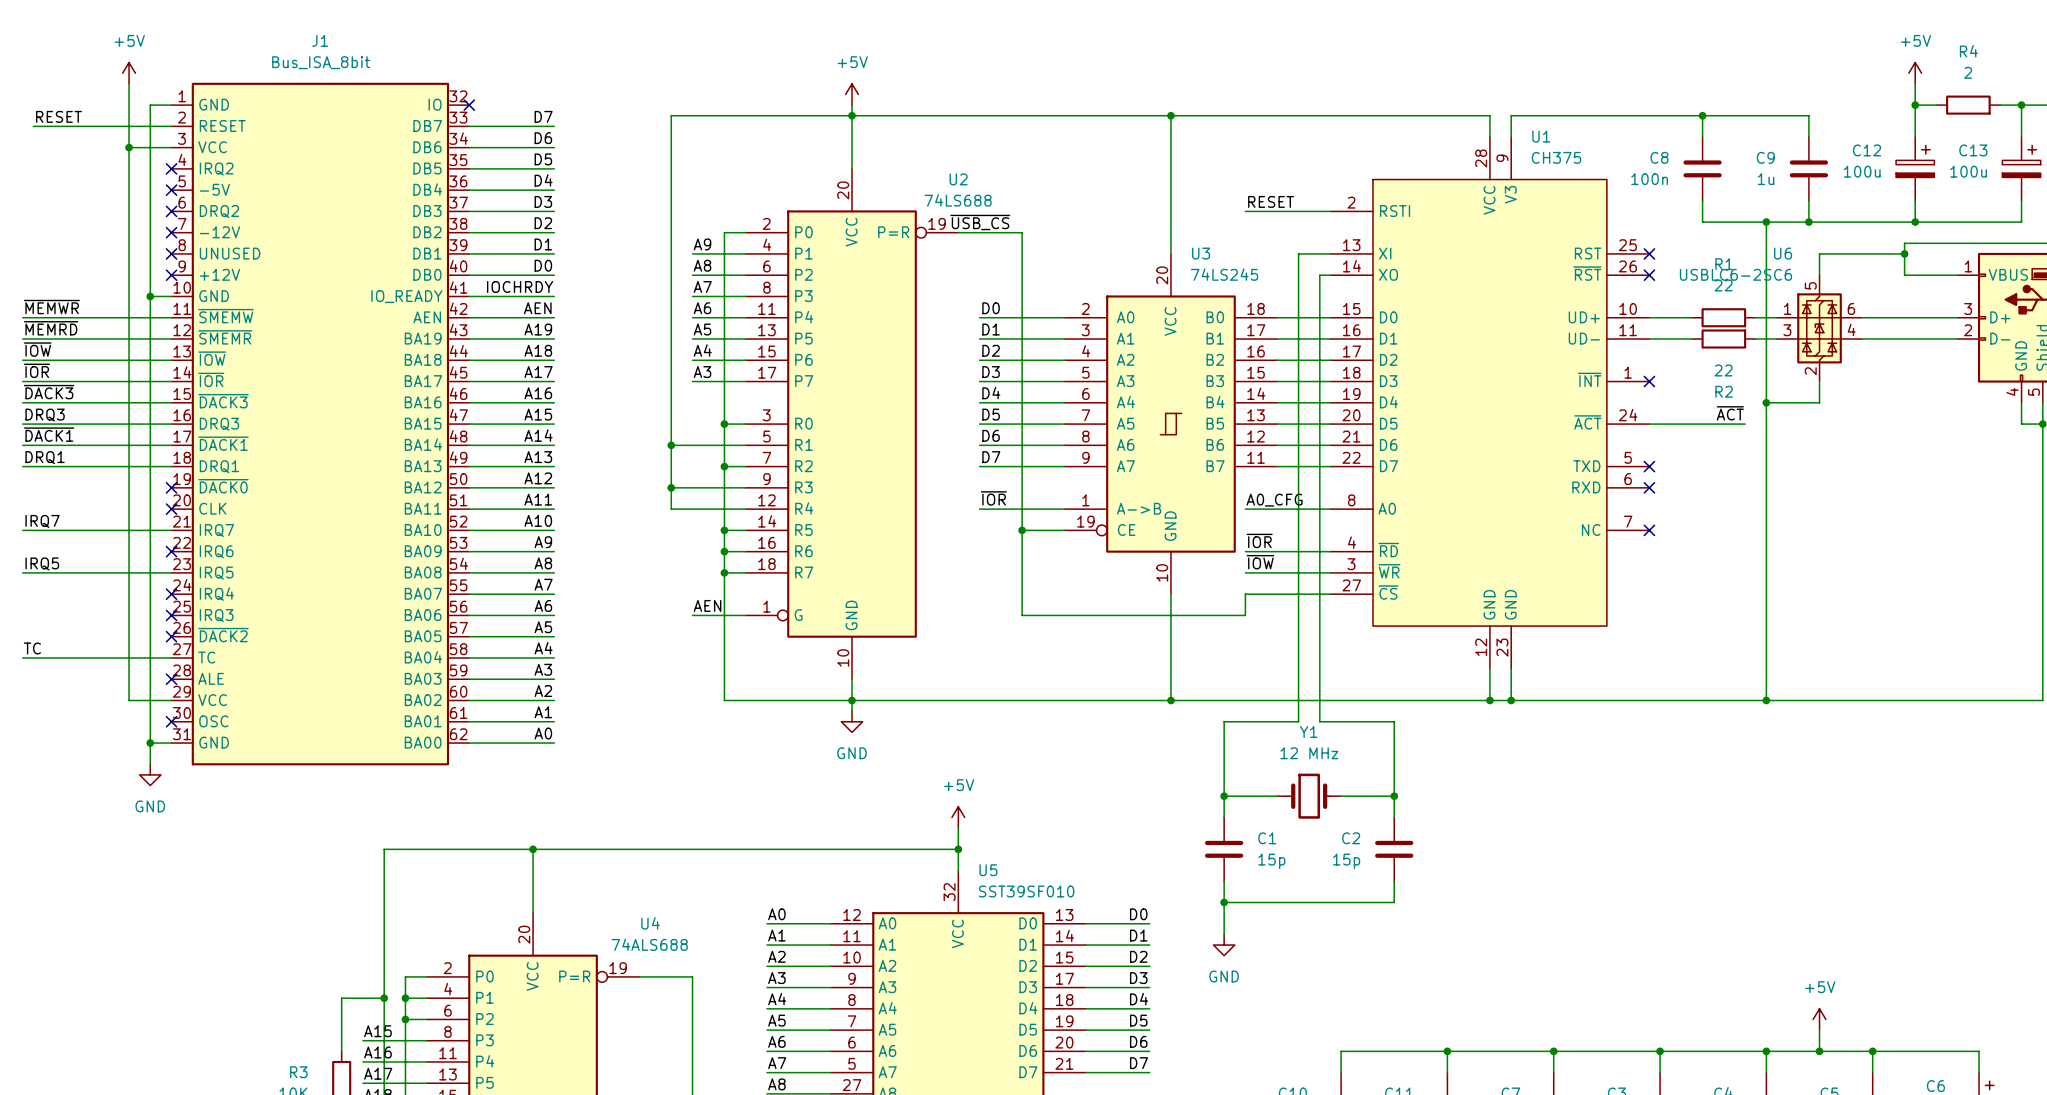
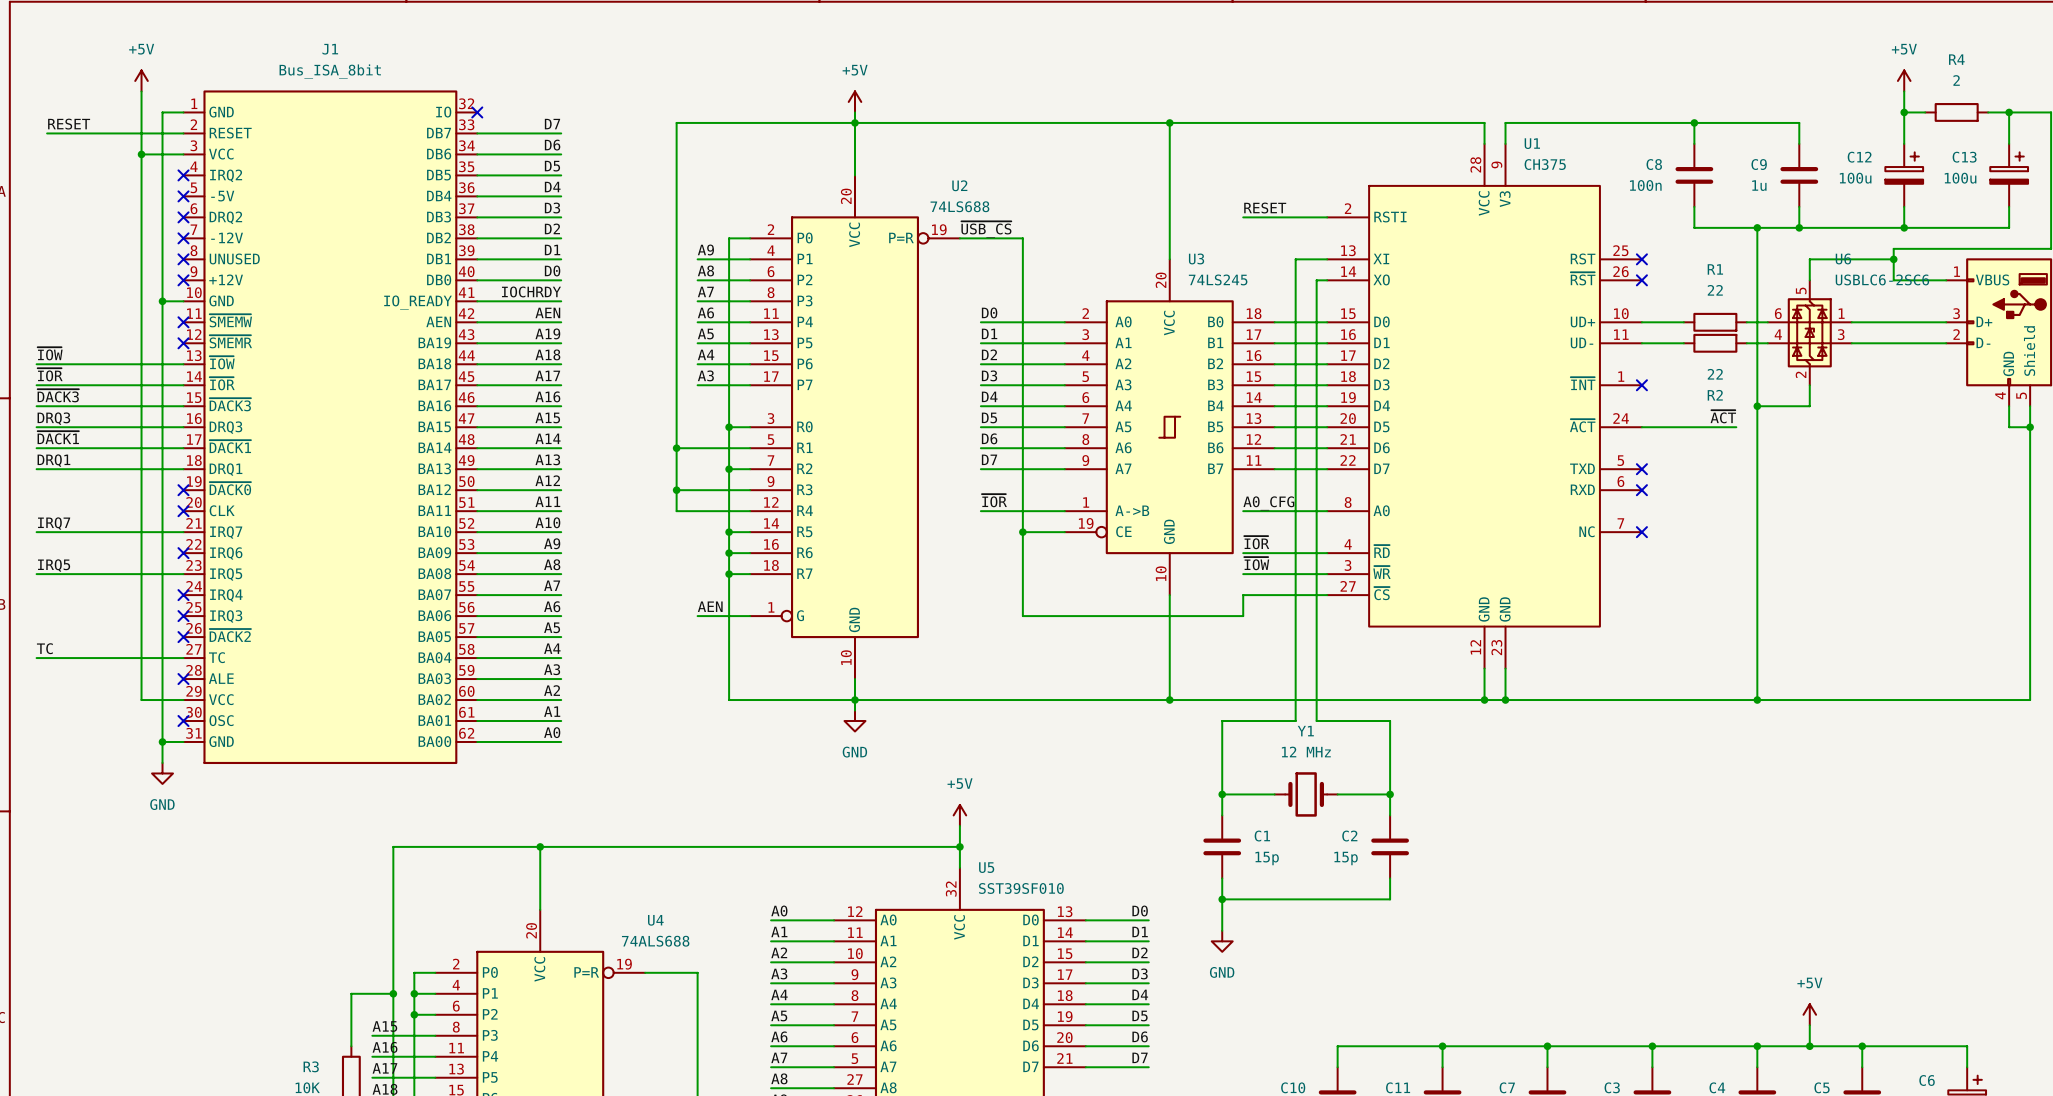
label: ~{MEMWR} (51, 307) -> none
wire: (22, 317) (171, 317) -> none
no-connect mark: none -> (183, 322)
label: ~{MEMRD} (51, 328) -> none
U6 flip: as is (1819, 328) -> left-right (1809, 332)
wire: (22, 339) (171, 339) -> none
no-connect mark: none -> (183, 343)

